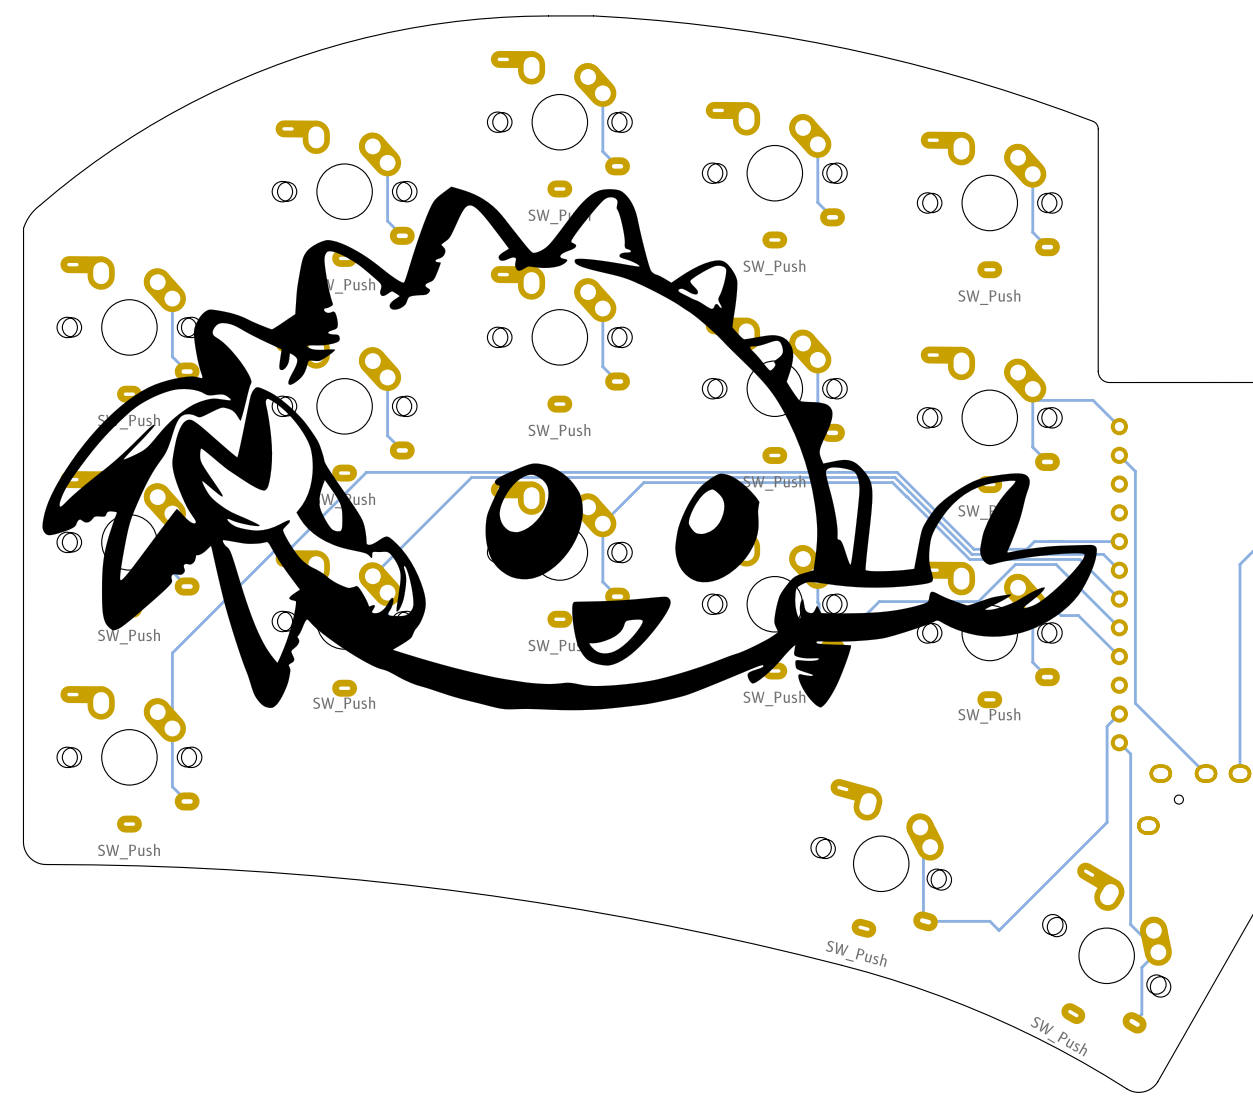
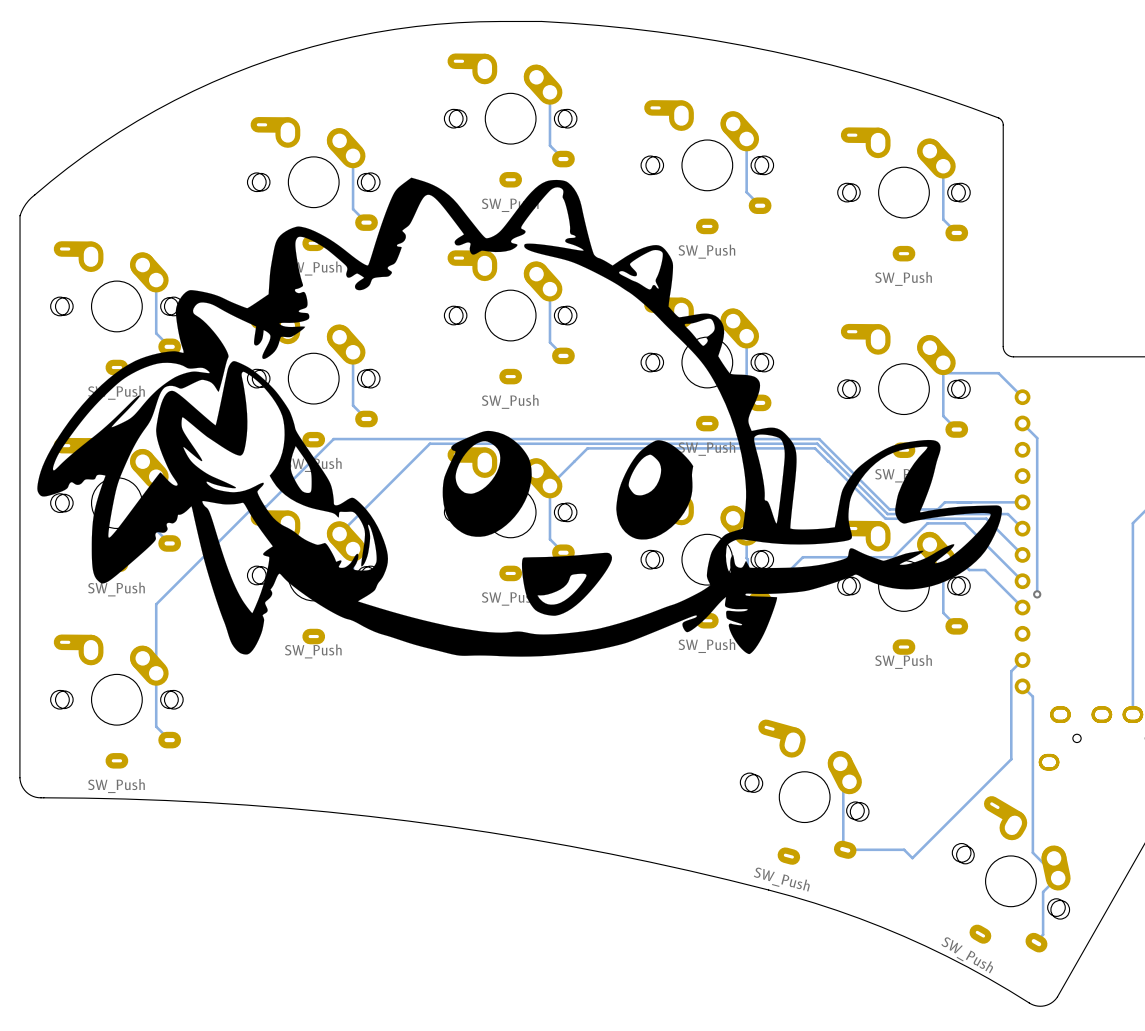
track: (1135, 642) (1135, 703) (1206, 773) -> none
via: none -> (1037, 594)

